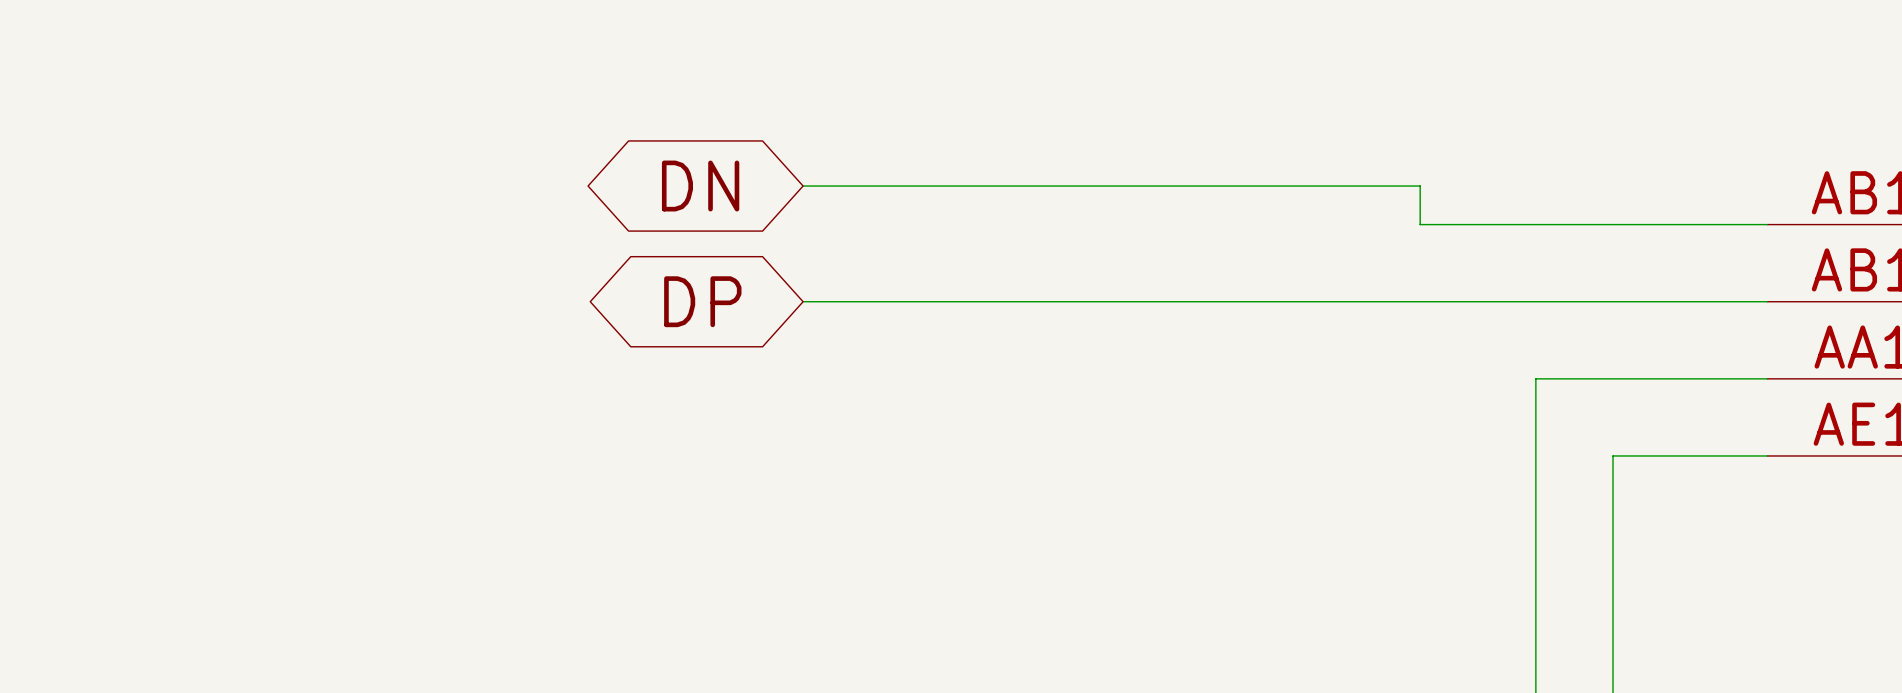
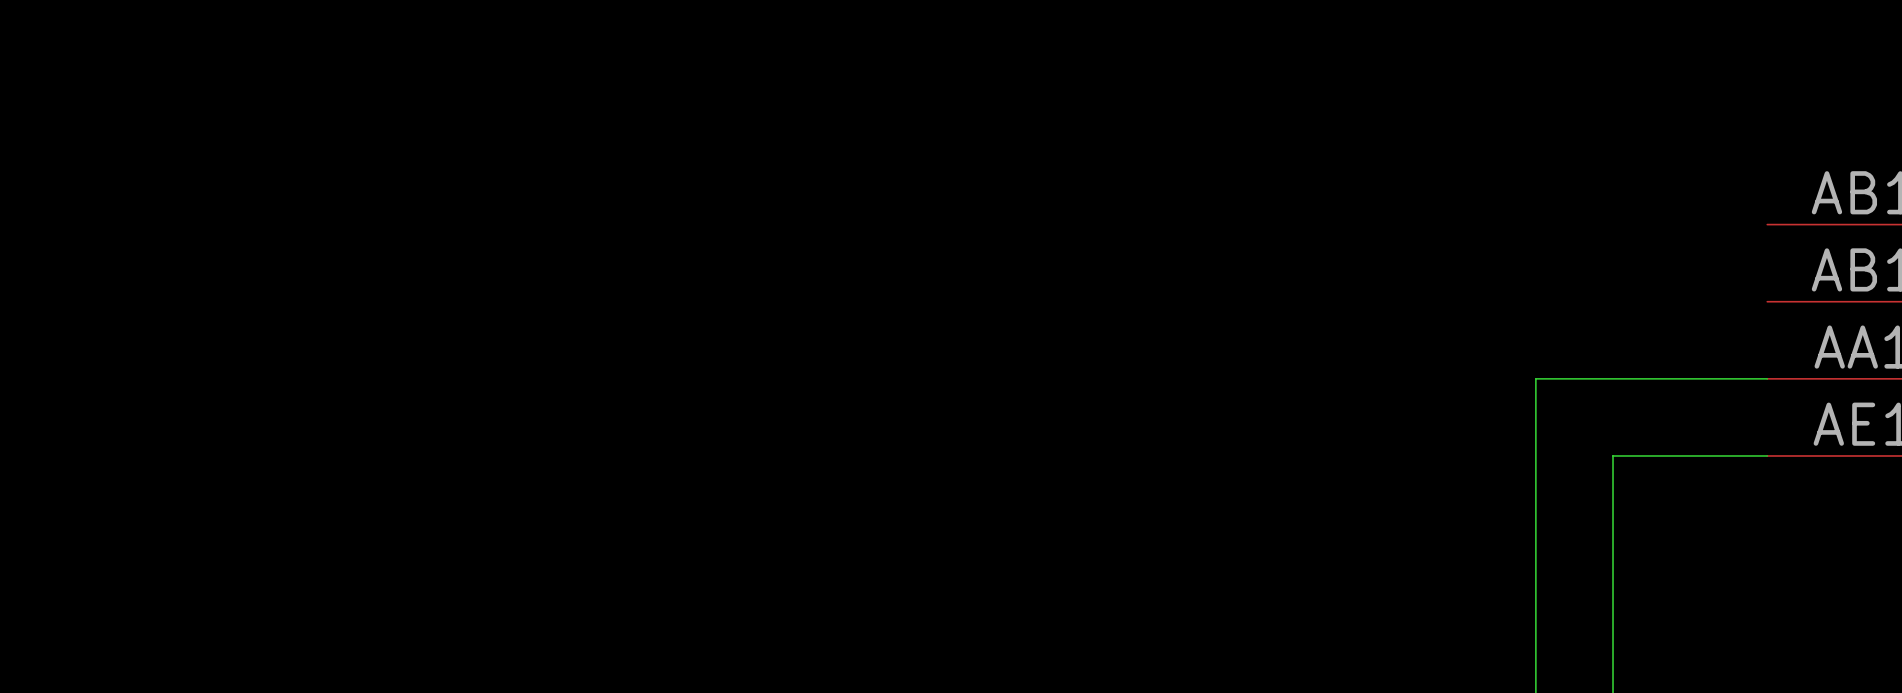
global label: DN (700, 186) -> none
wire: (803, 186) (1420, 186) (1420, 224) (1767, 224) -> none
global label: DP (702, 301) -> none
wire: (803, 301) (1767, 301) -> none

